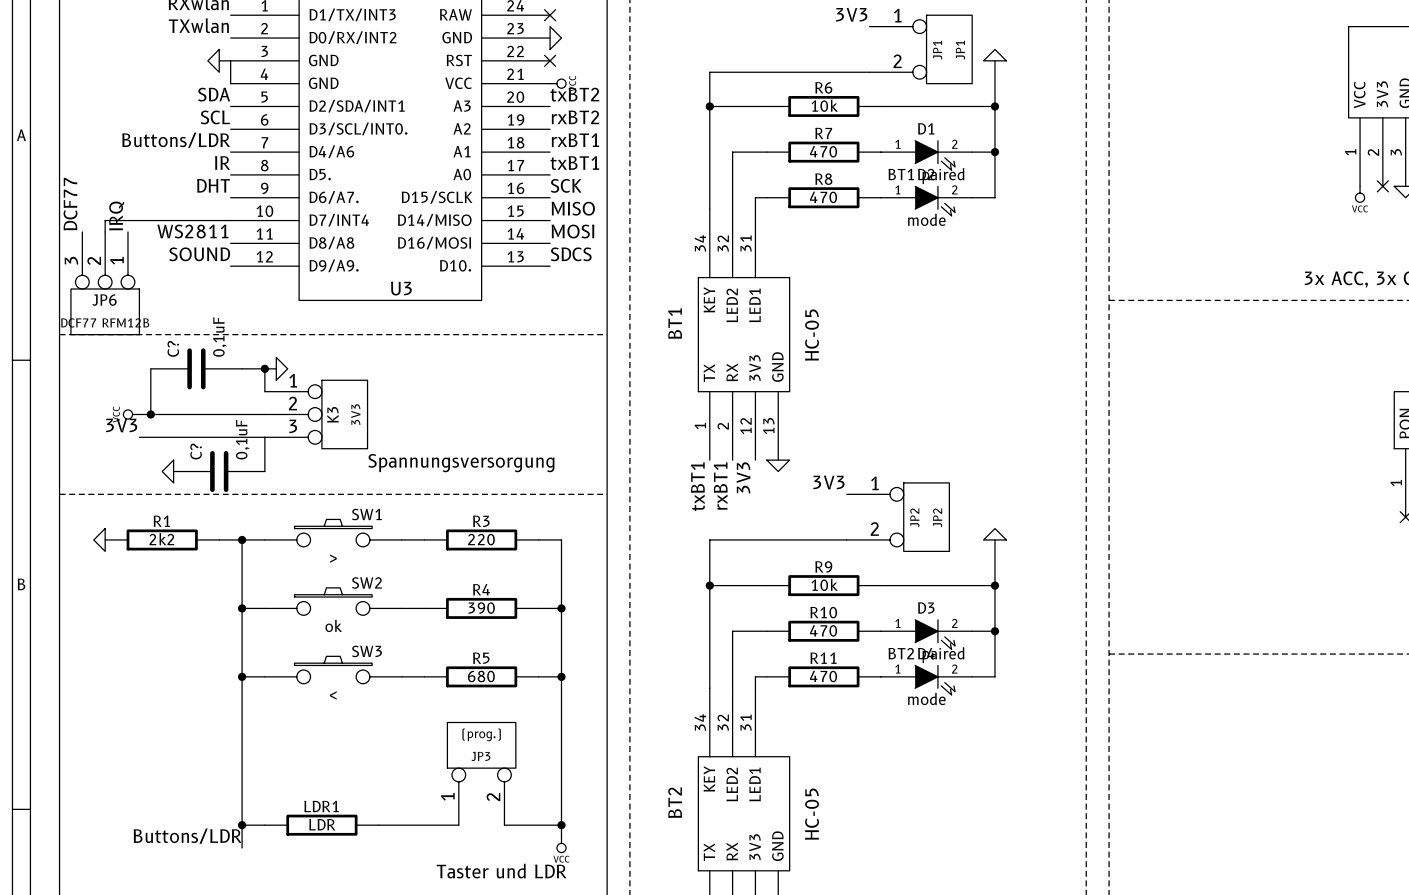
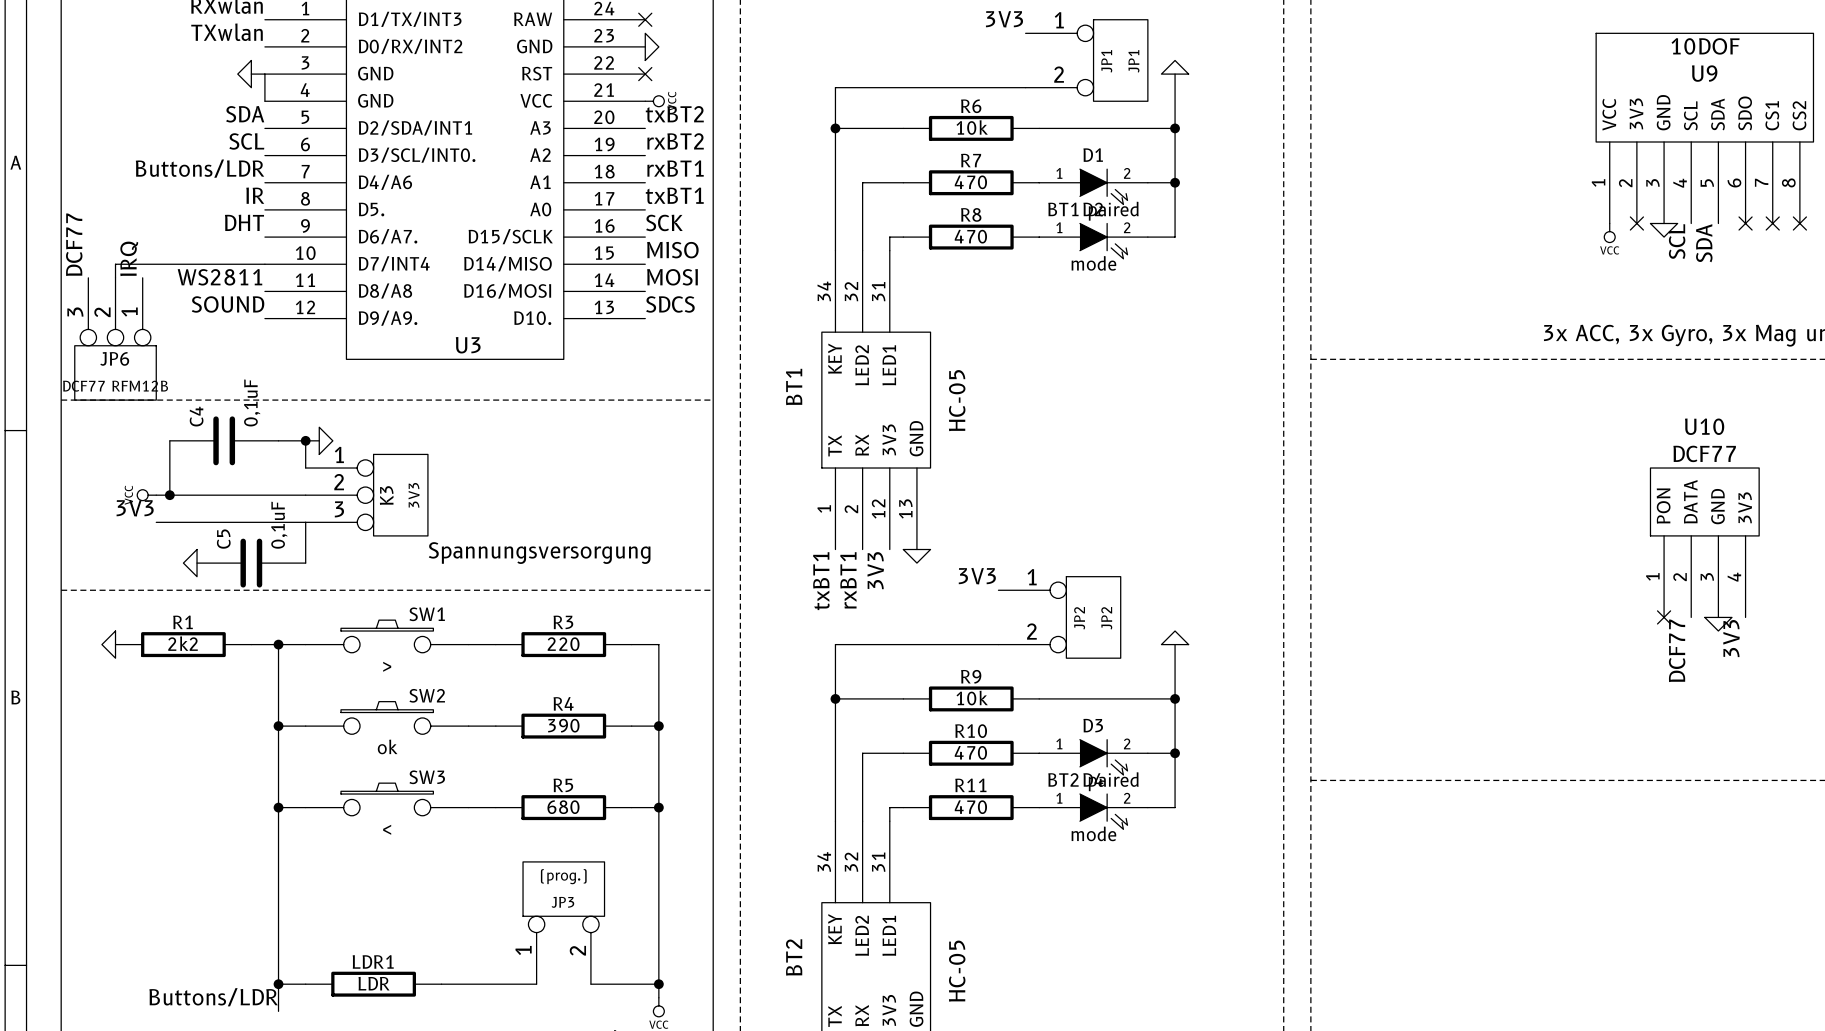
C? name: C? (173, 348) -> C4 (196, 416)
C? name: C? (196, 451) -> C5 (223, 539)

